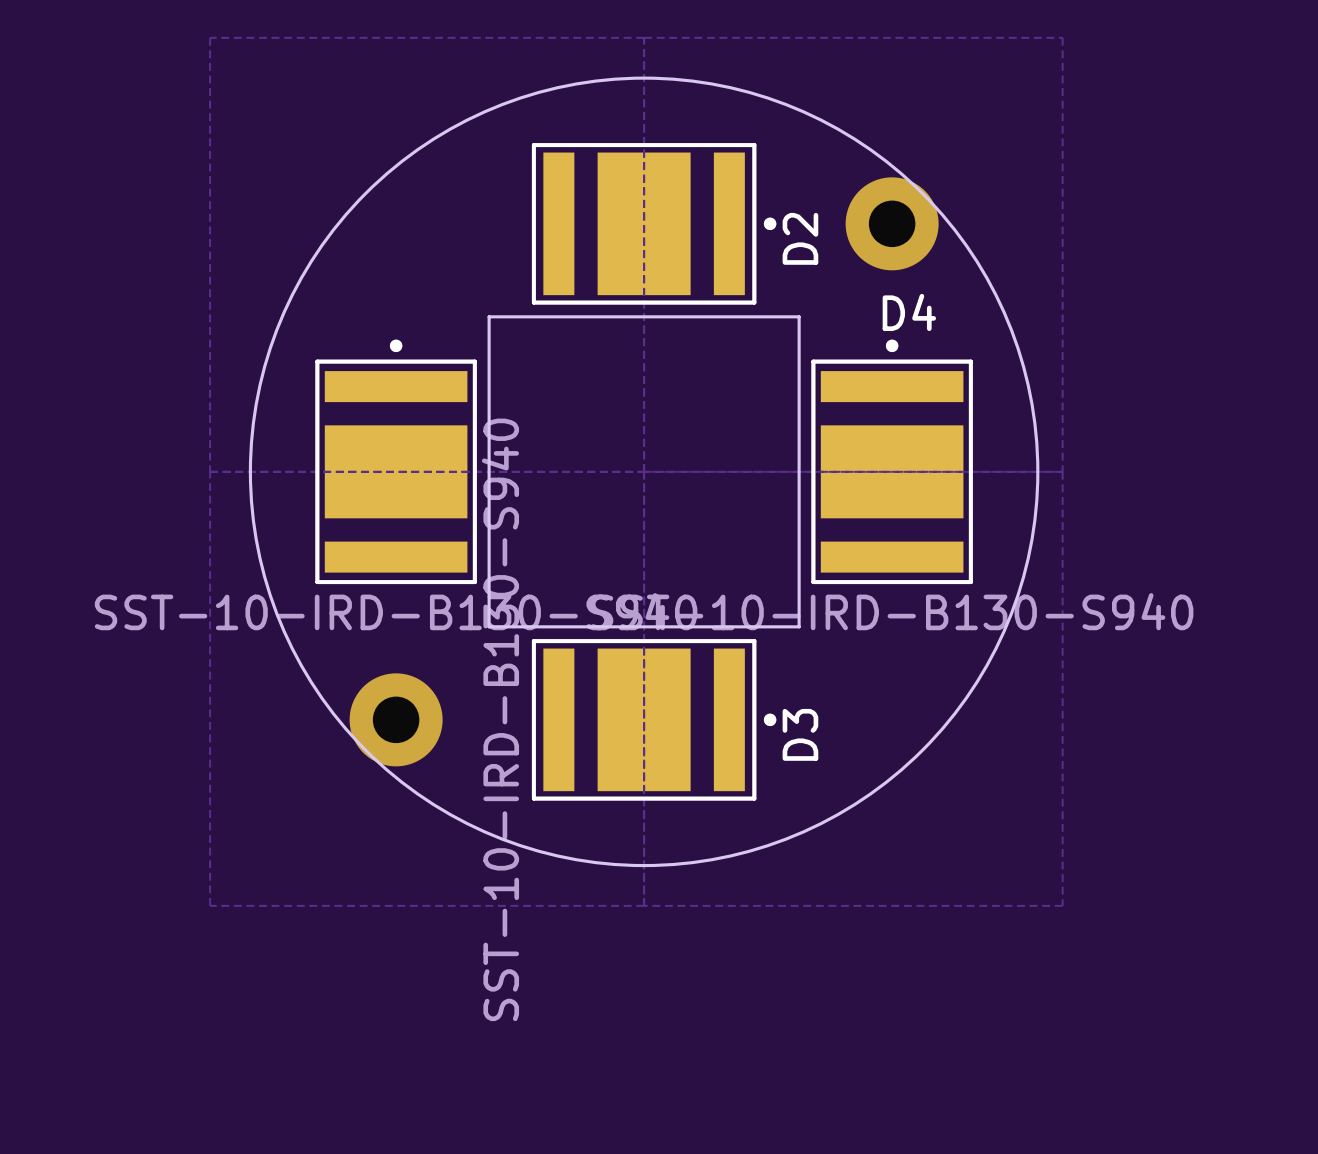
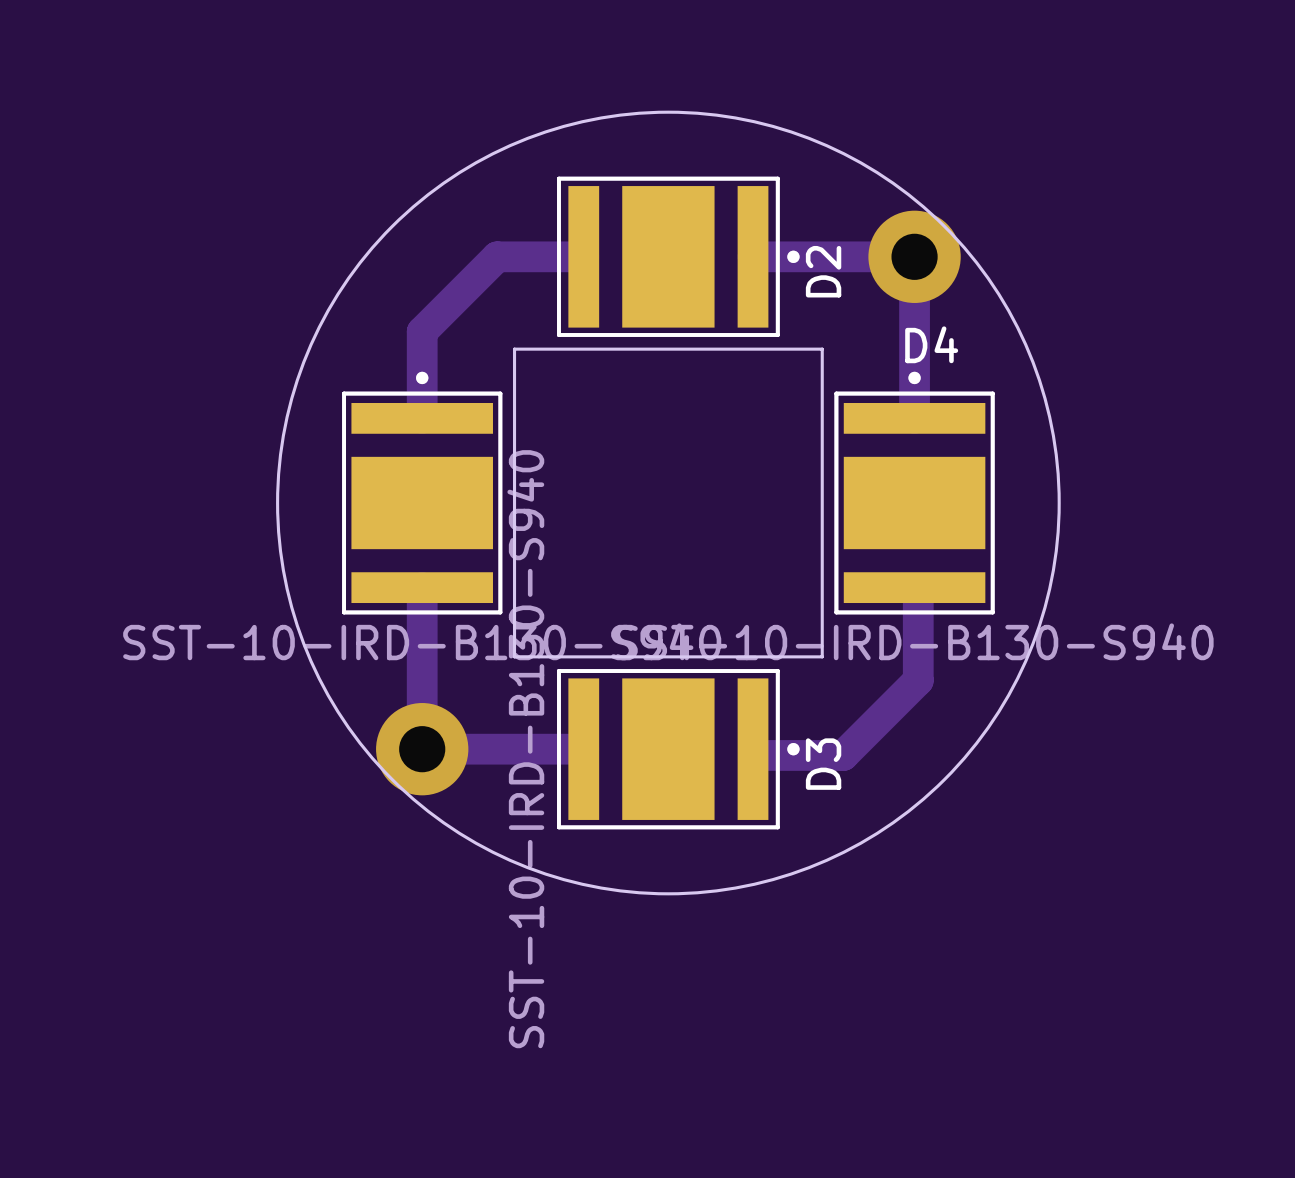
zone outline: (210, 37) (210, 905) (1062, 905) (1062, 37) (210, 37) -> none
zone outline: (644, 37) (644, 905) -> none
track: none -> (583, 256) (497, 256) (422, 331) (422, 418)
track: none -> (753, 256) (914, 256) (914, 418)
zone outline: (210, 471) (1062, 471) -> none
track: none -> (422, 587) (422, 749) (583, 749)
track: none -> (918, 593) (918, 680) (843, 755) (756, 755)

